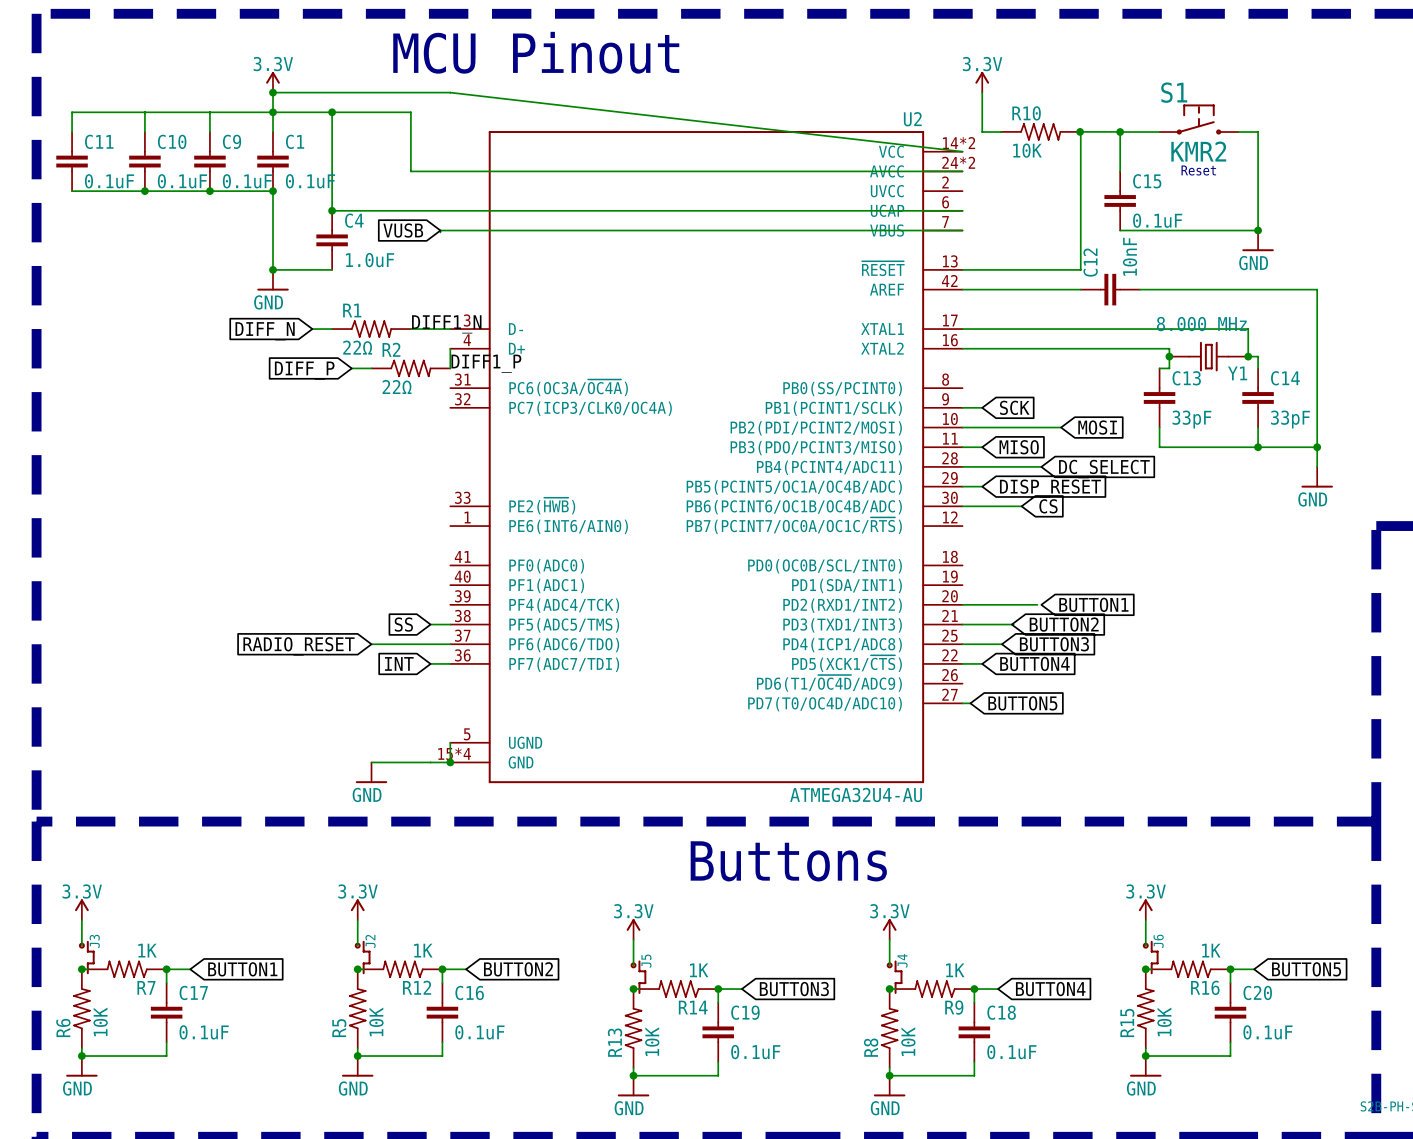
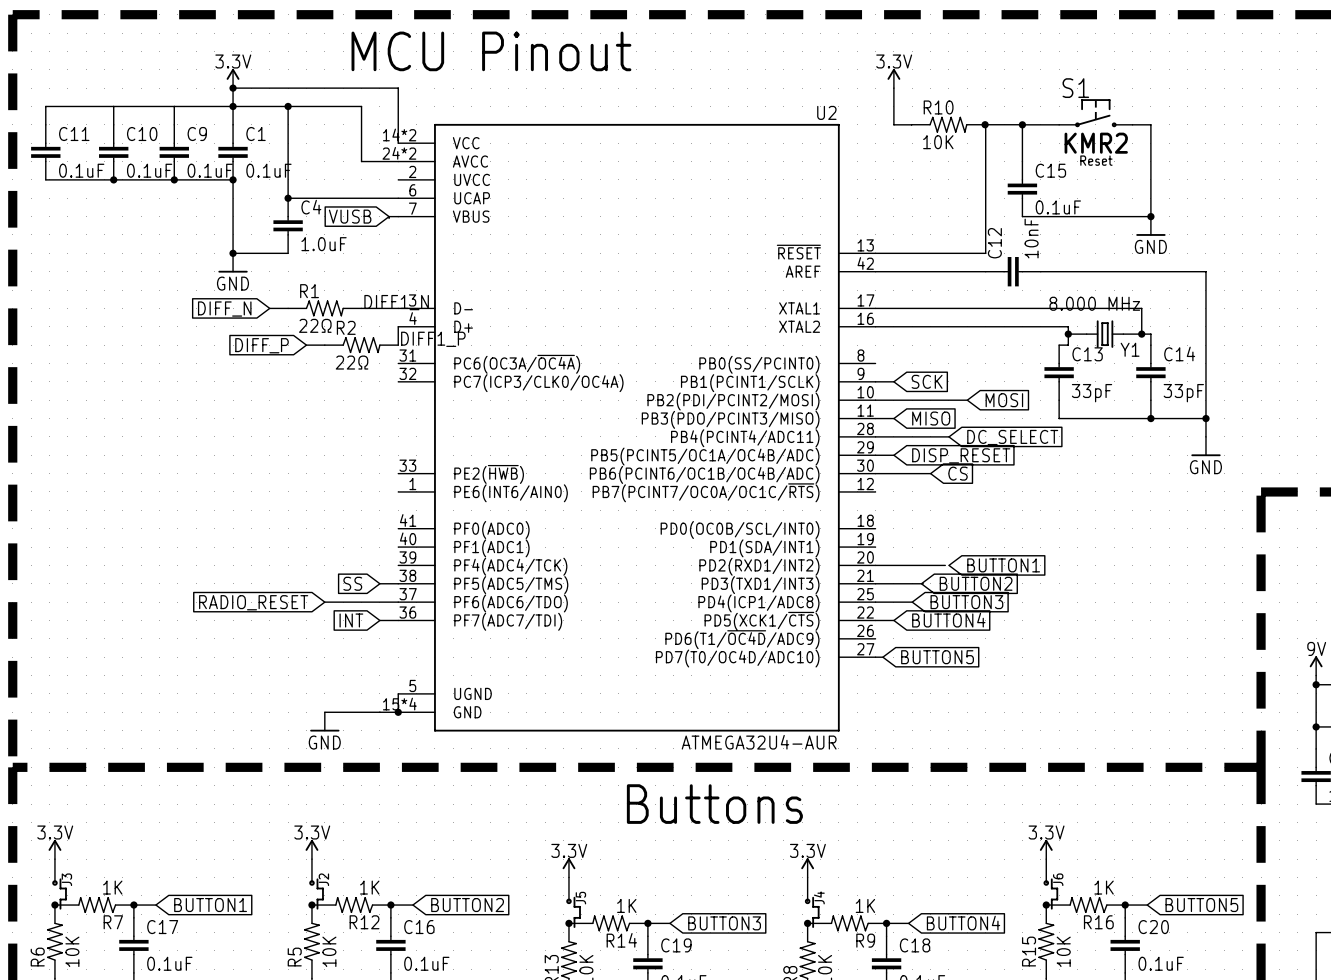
wire: (450, 92) (962, 151) -> (398, 88) (398, 143)
U2 symbol: [450, 131, 963, 784] -> [398, 123, 876, 732]
wire: (450, 171) (962, 171) -> none
wire: (450, 210) (962, 210) -> none
wire: (450, 230) (962, 230) -> none
U2 value: ATMEGA32U4-AU (856, 794) -> ATMEGA32U4-AUR (759, 742)

